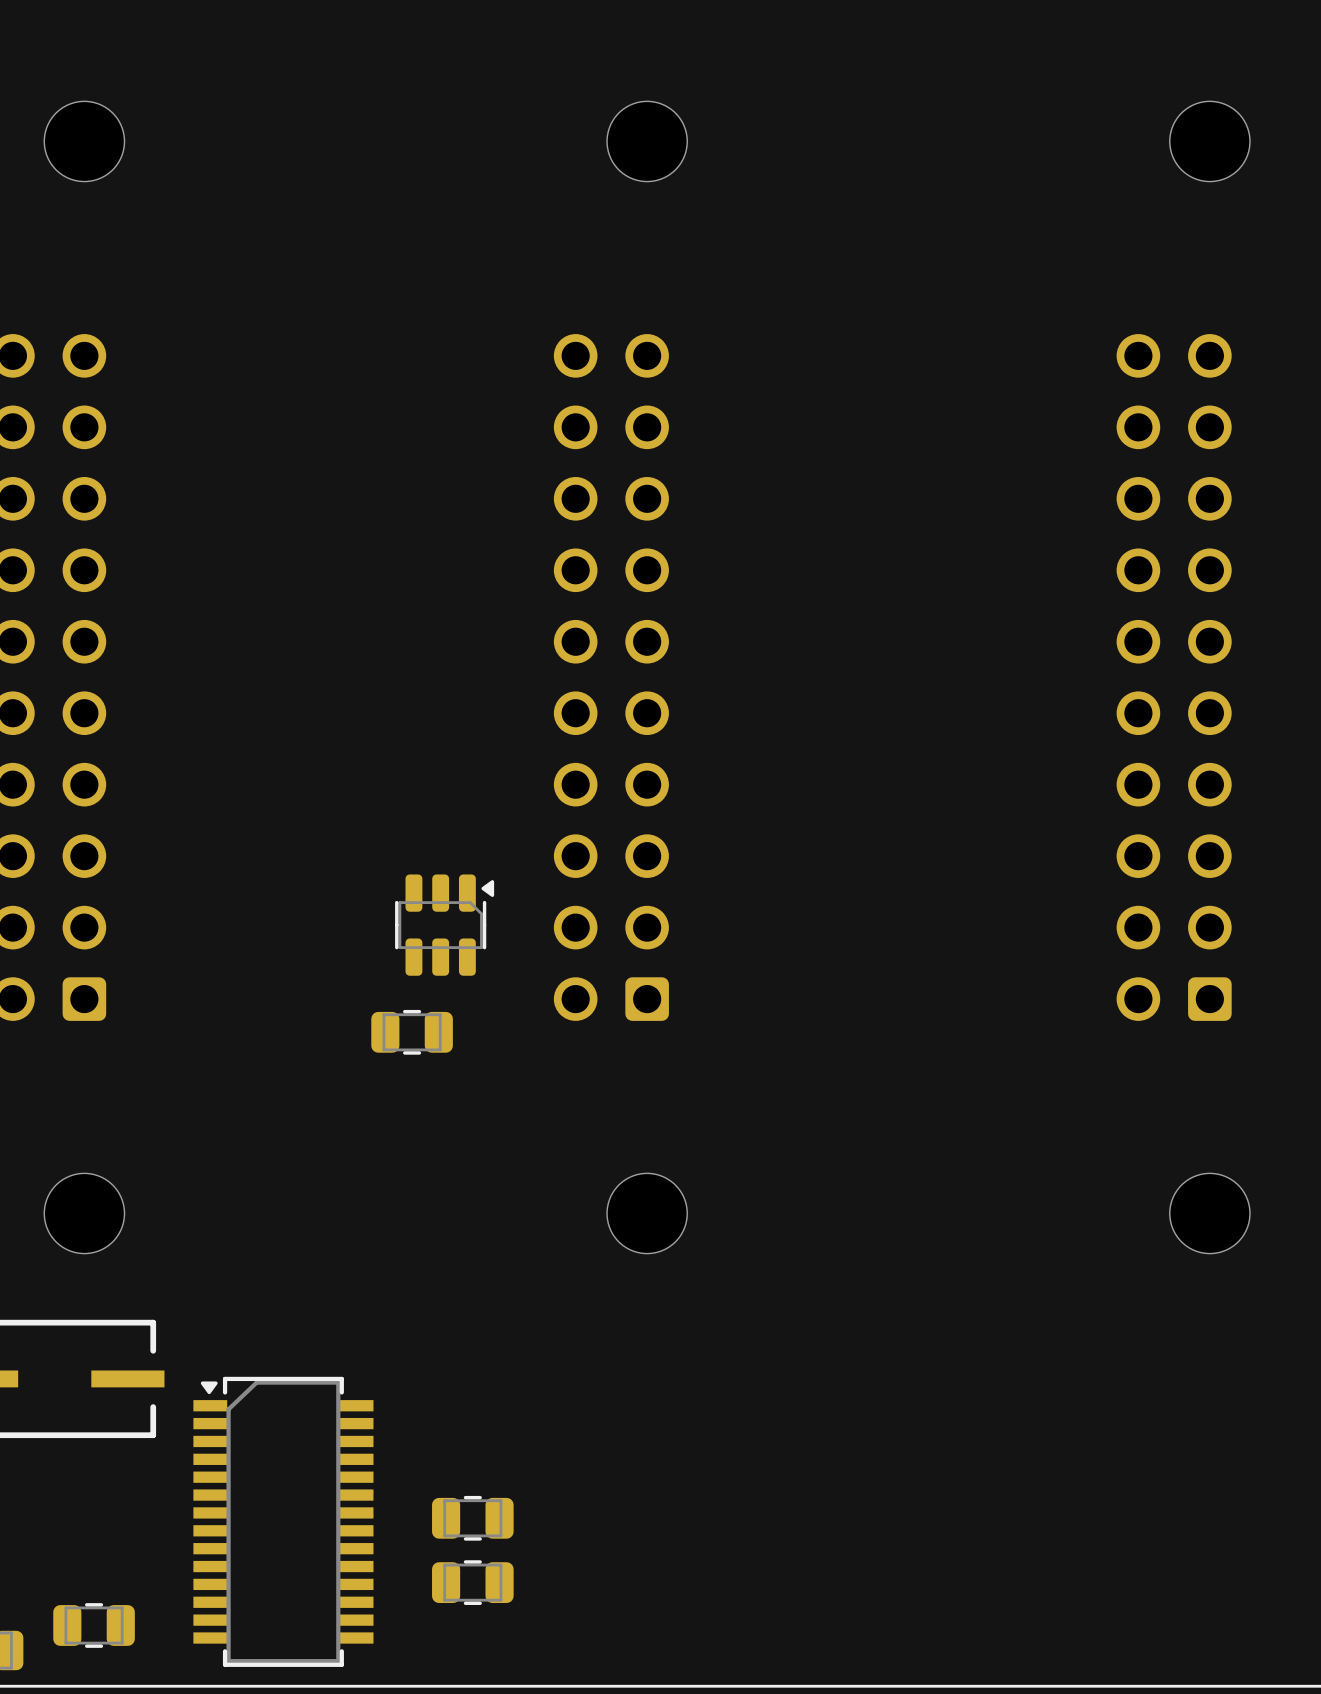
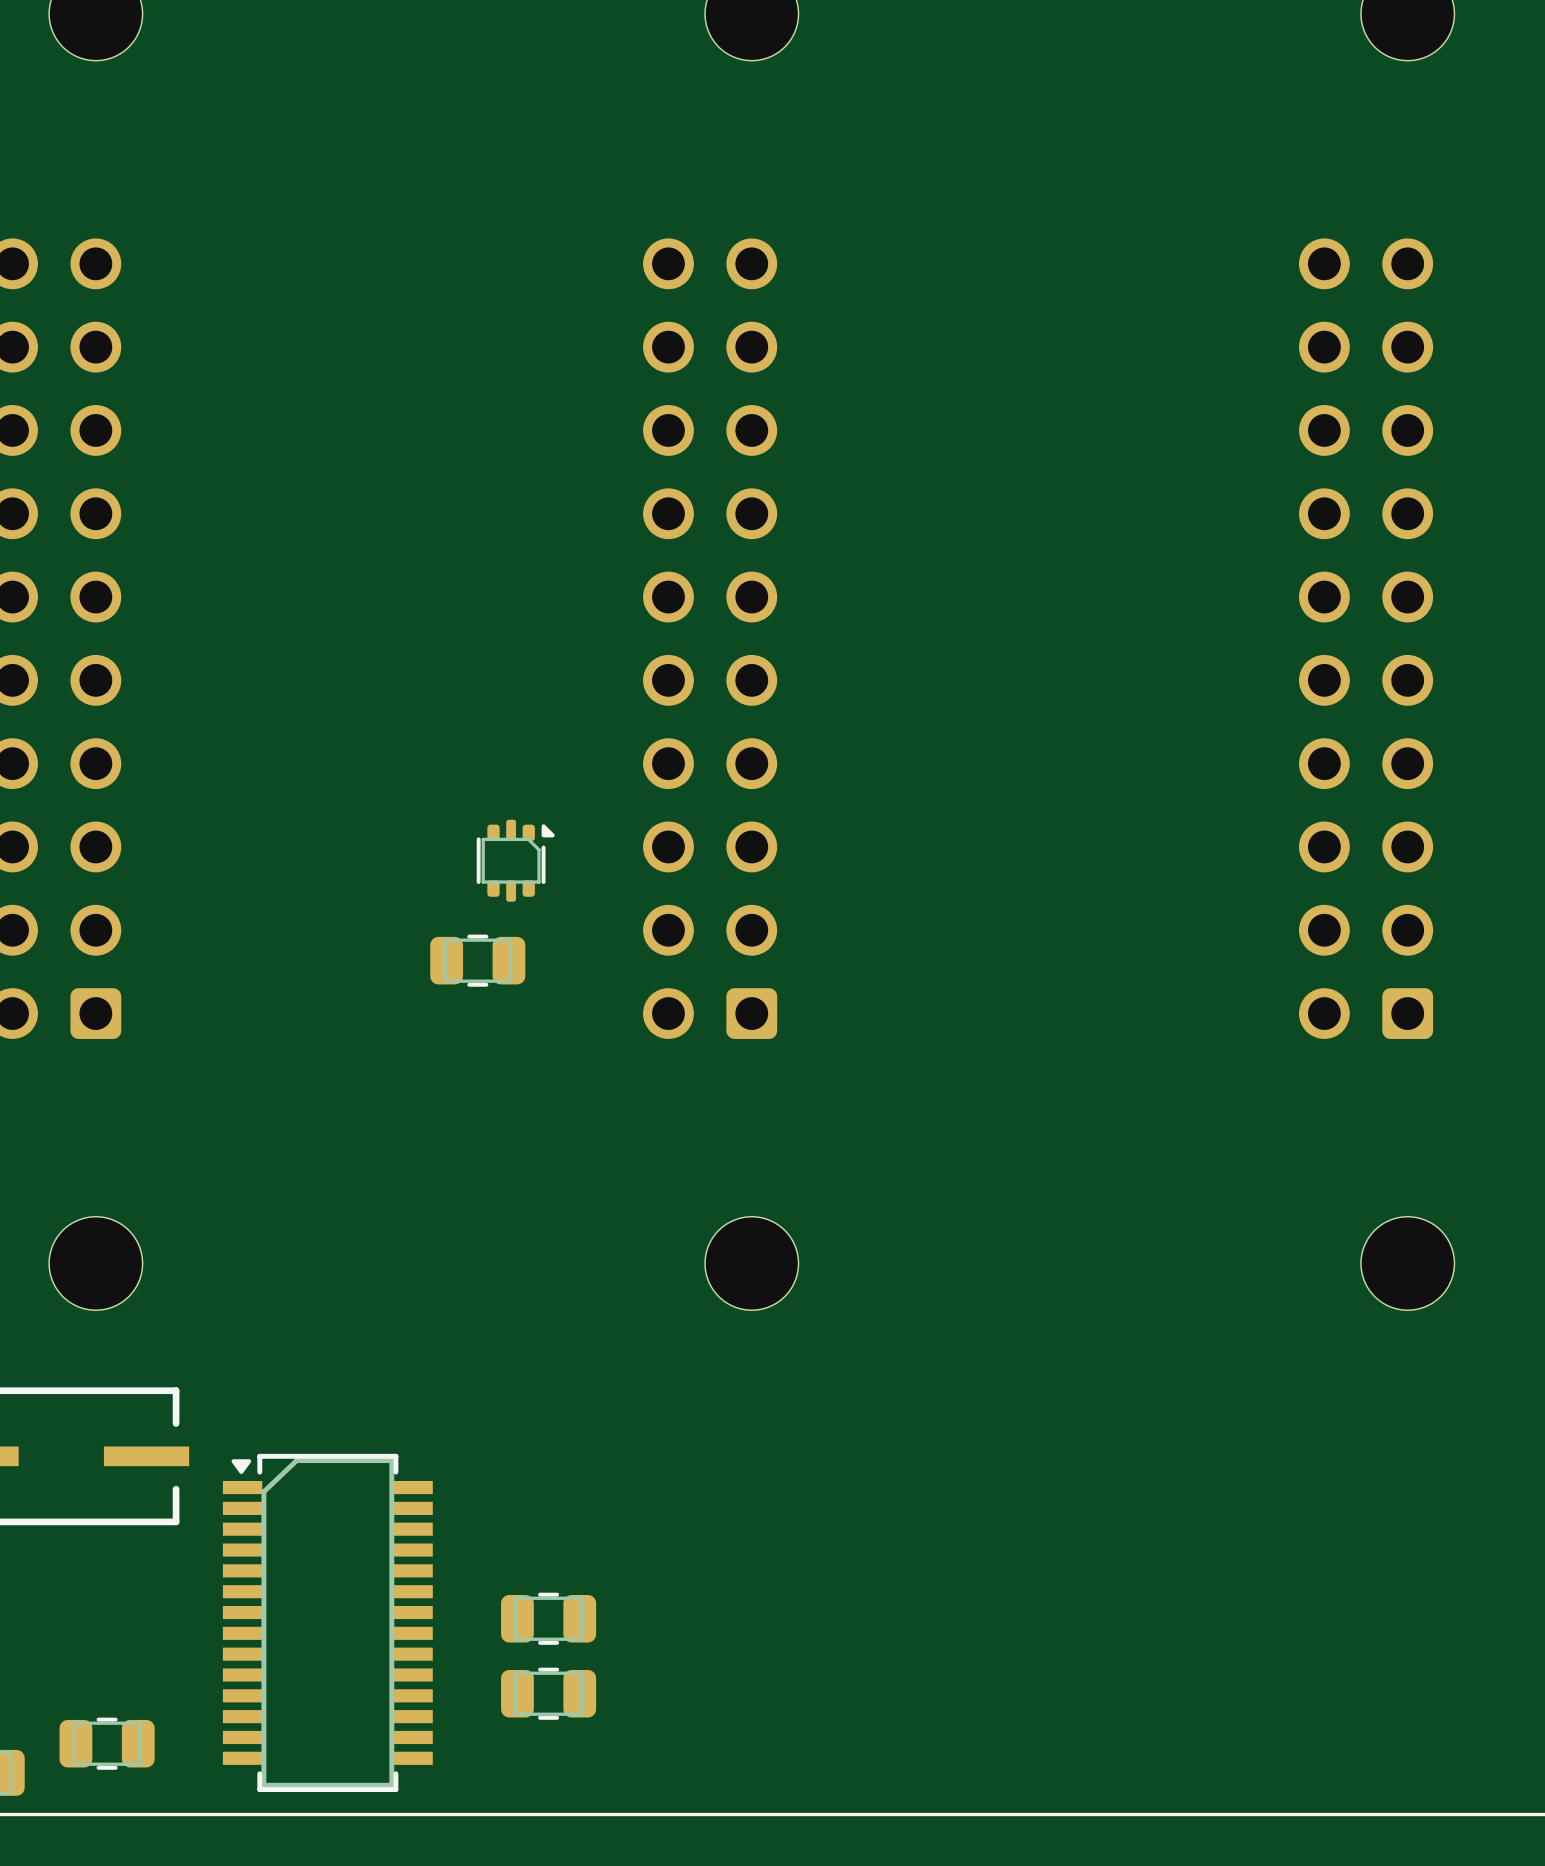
part: none -> (515, 860)
part: (444, 925) -> none
part position: (412, 1032) -> (477, 960)

